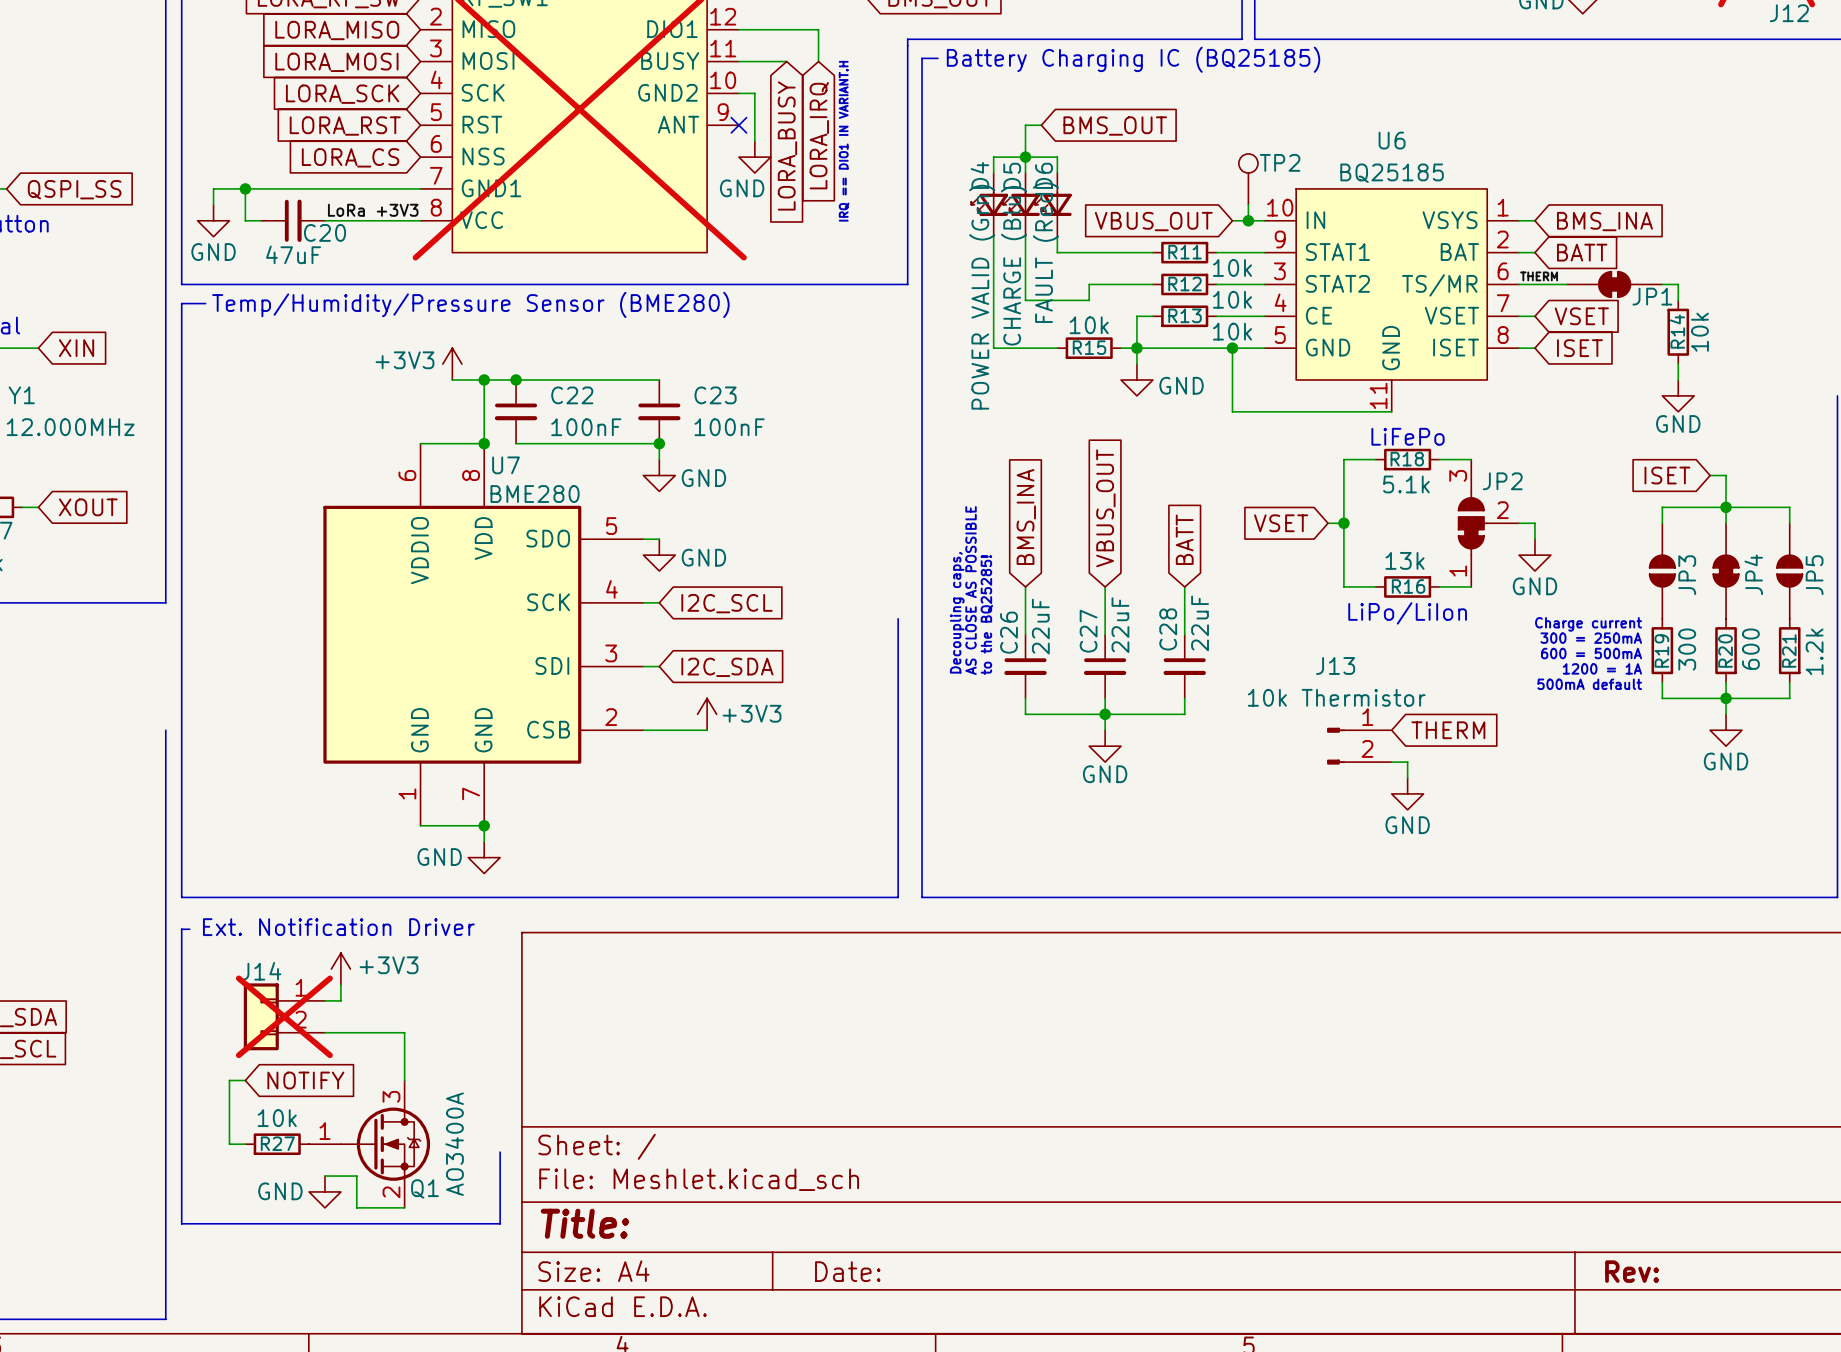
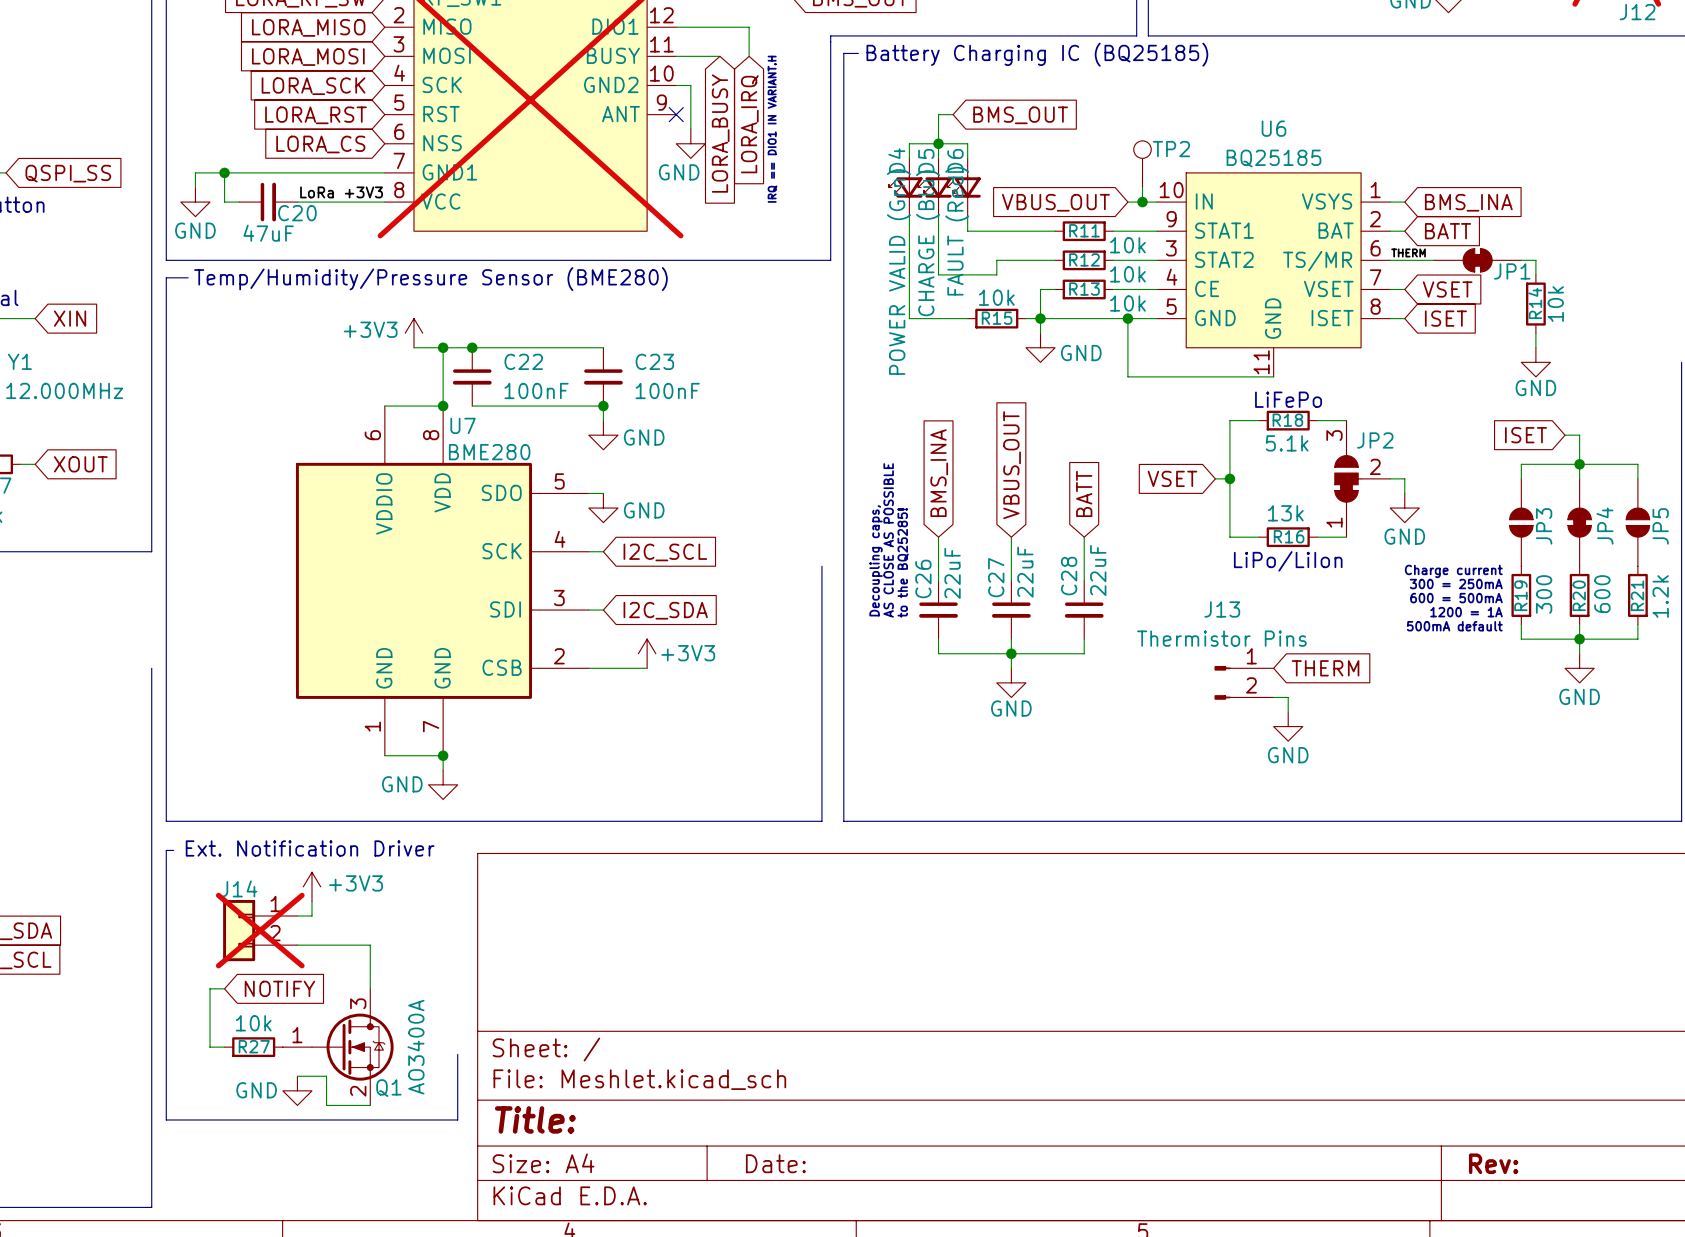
J13 value: 10k Thermistor (1336, 697) -> Thermistor Pins (1221, 638)

